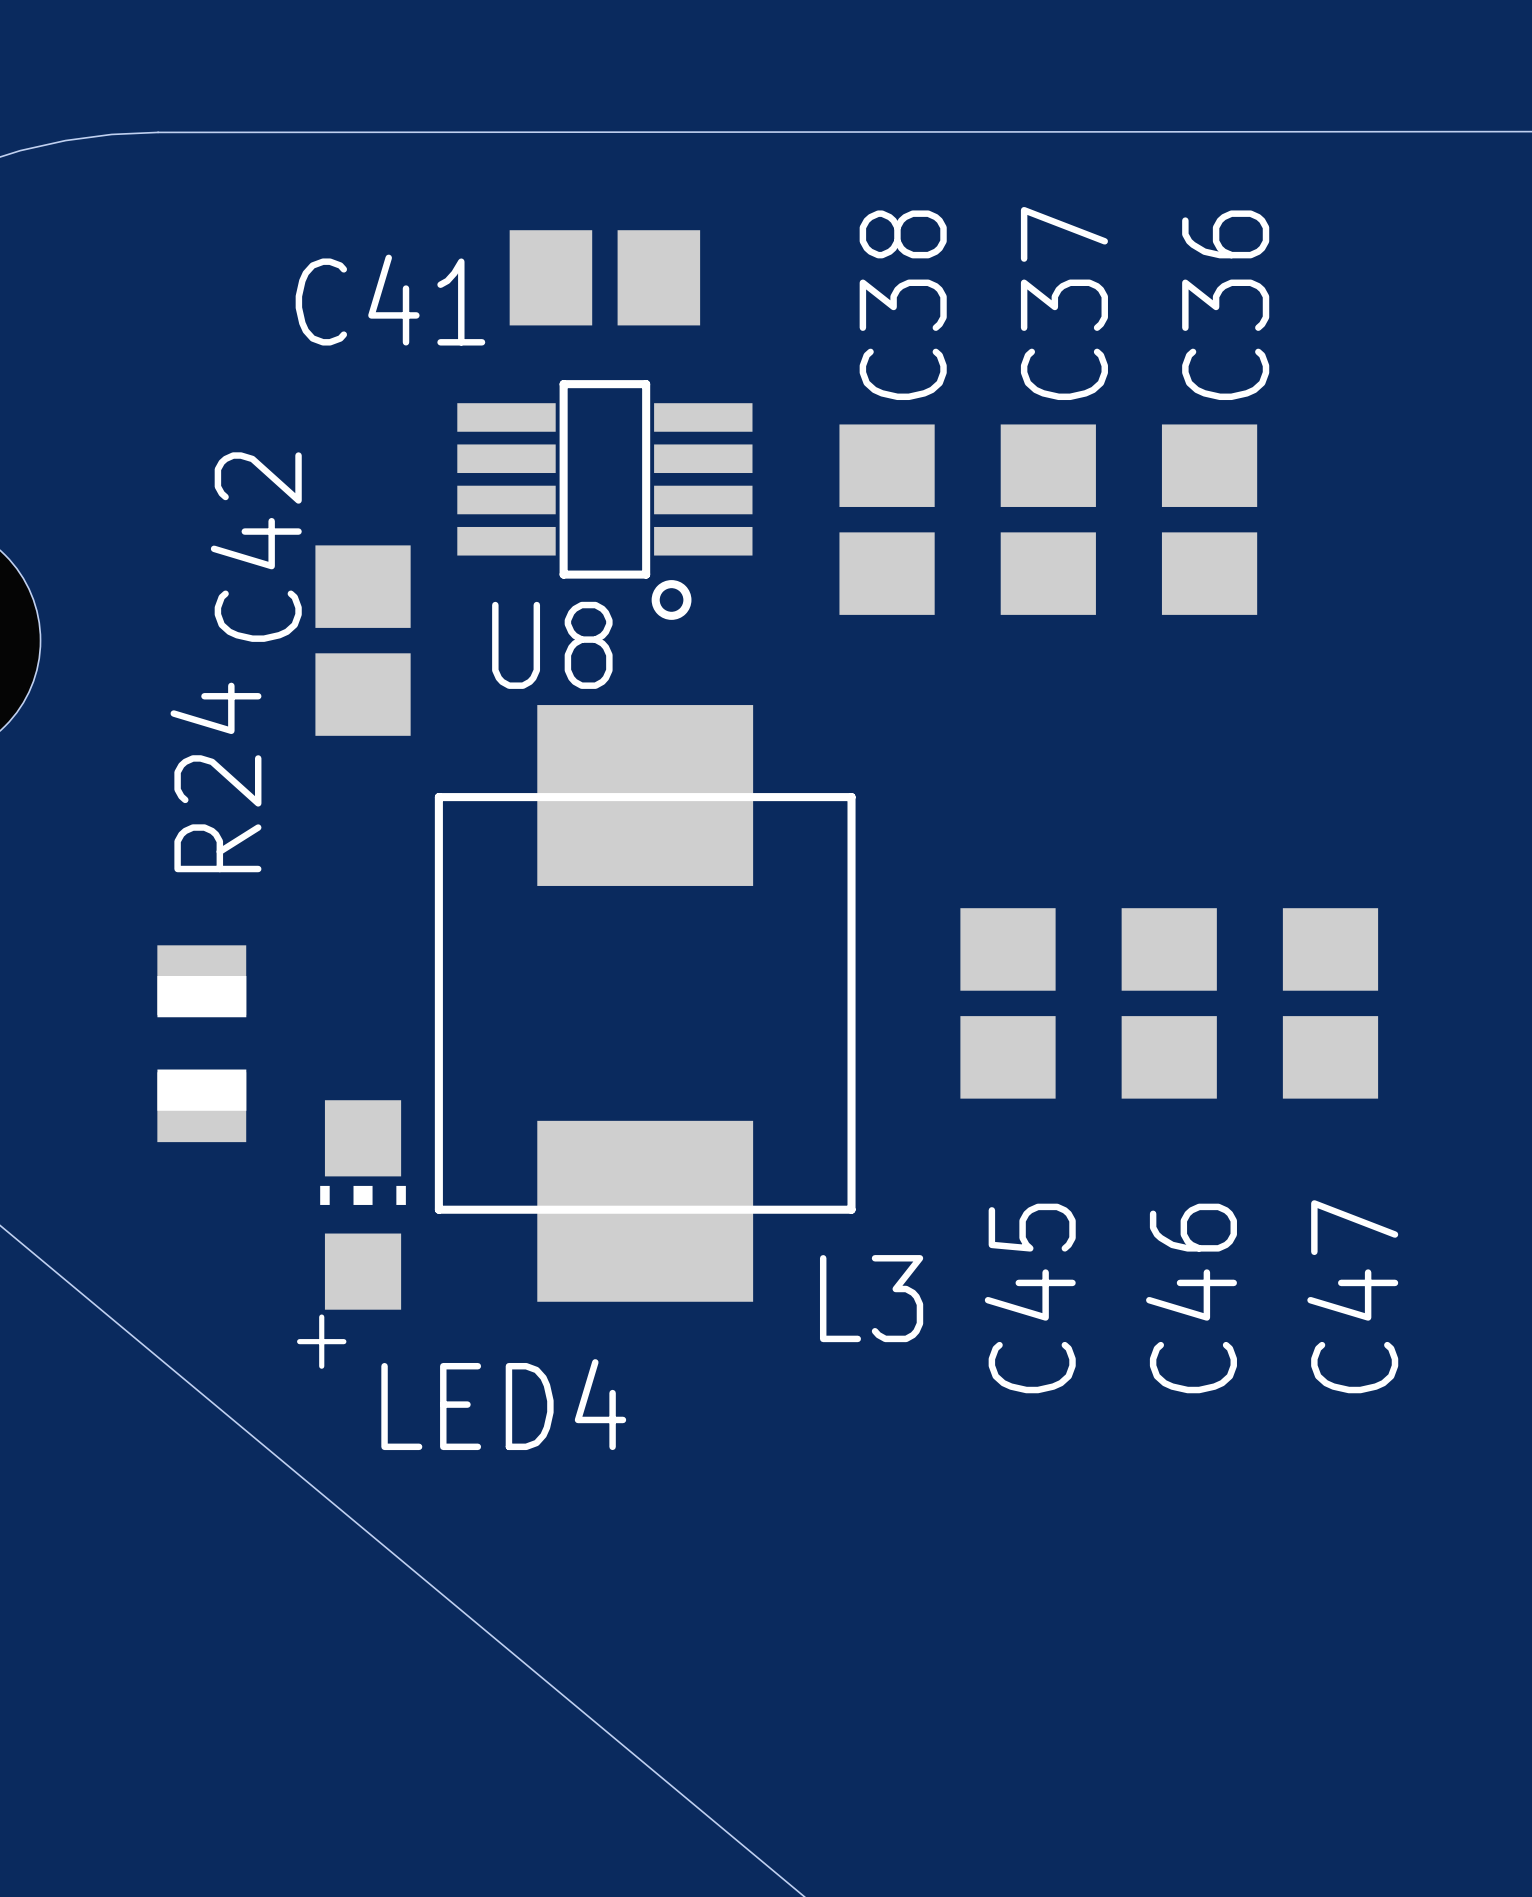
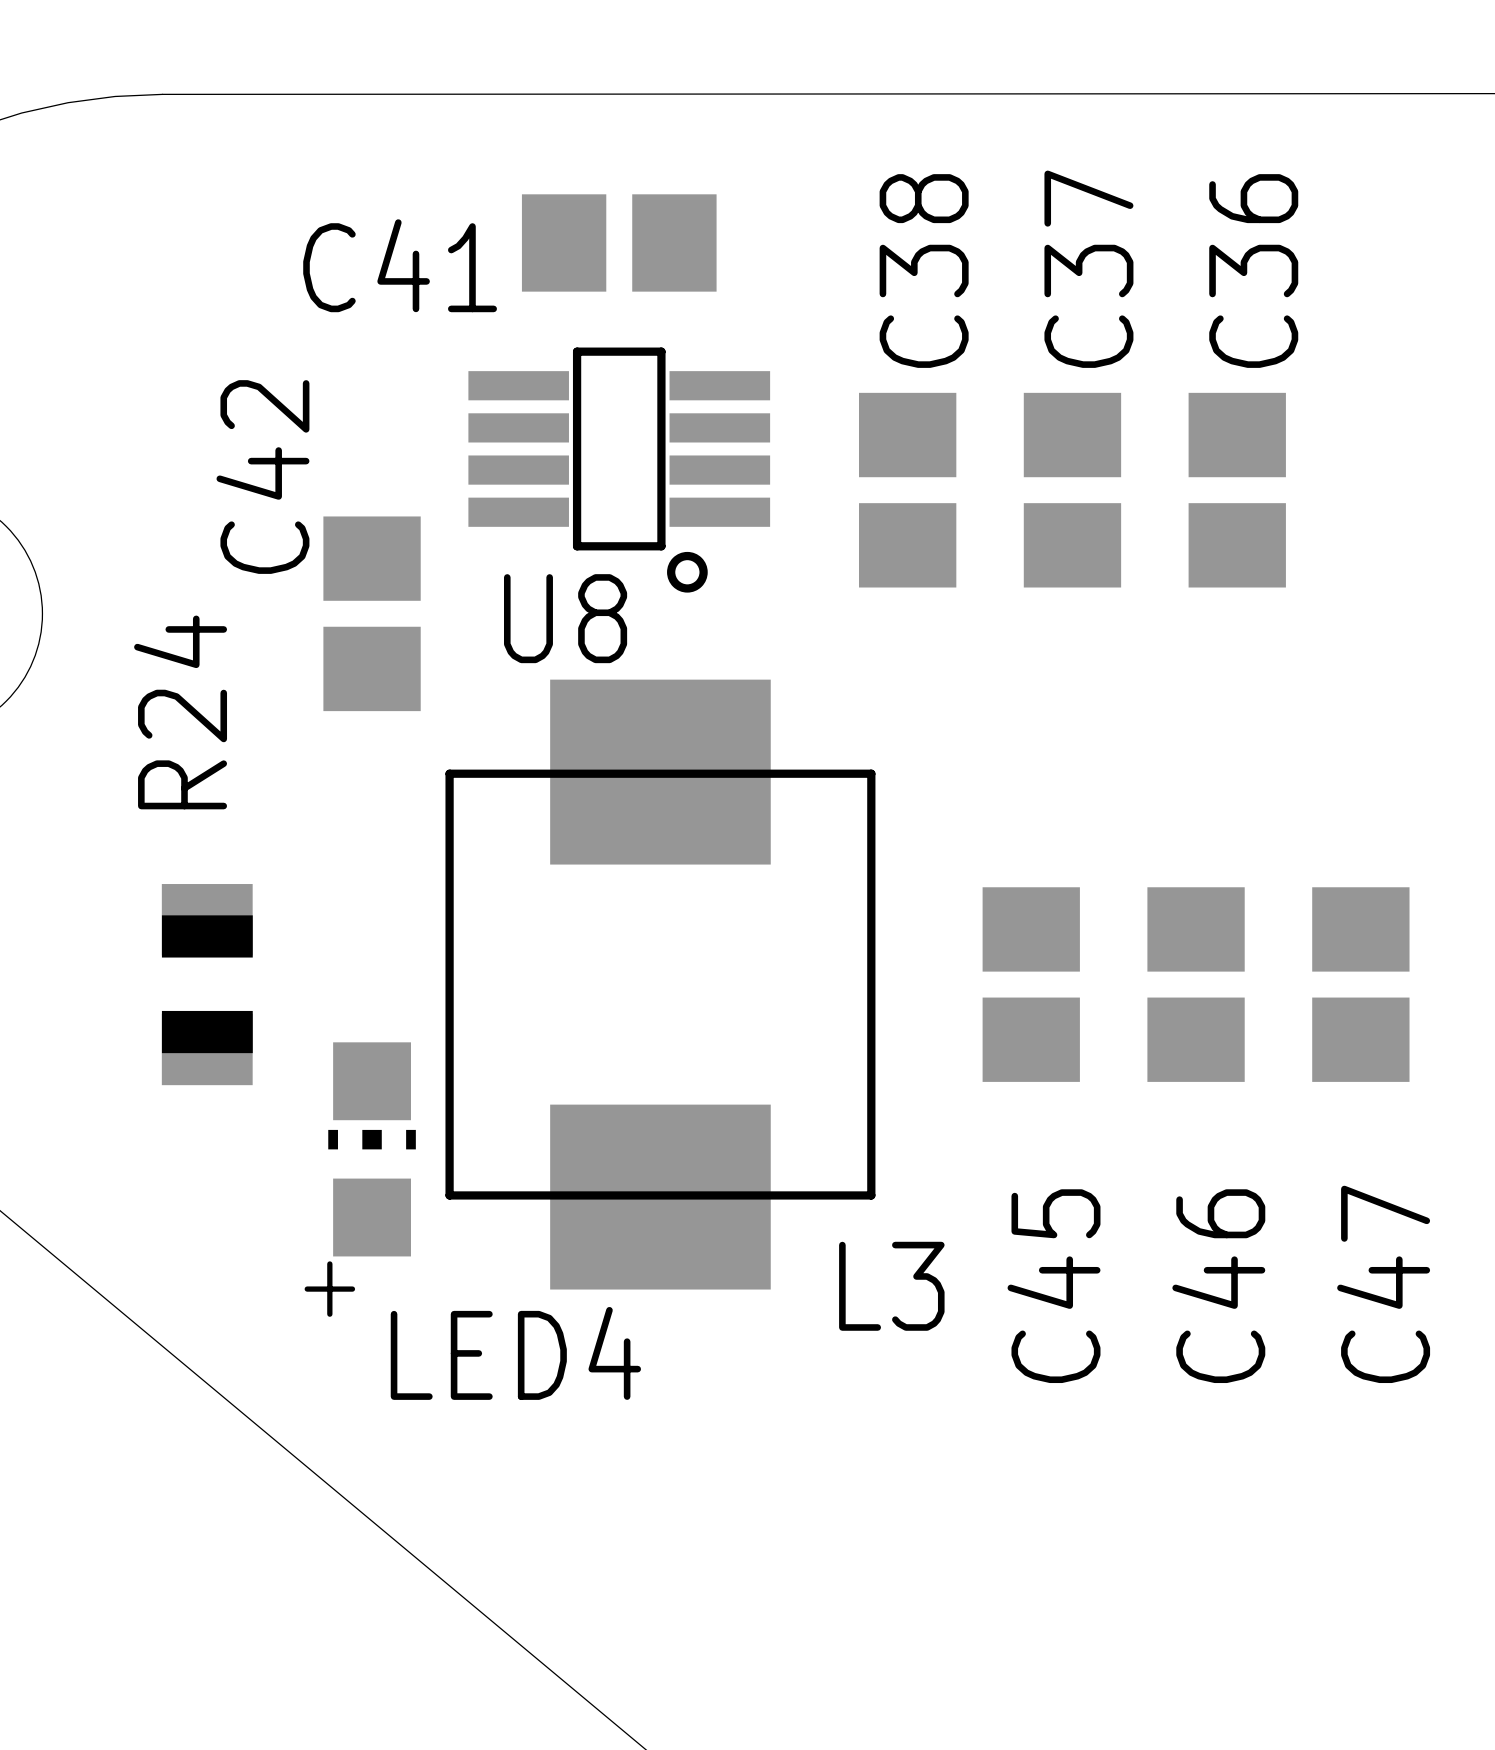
C42 name position: C42 (256, 547) -> C42 (262, 477)
R24 name position: R24 (215, 777) -> R24 (180, 712)
R24 position: (201, 1043) -> (207, 984)
LED4 position: (363, 1204) -> (372, 1149)

